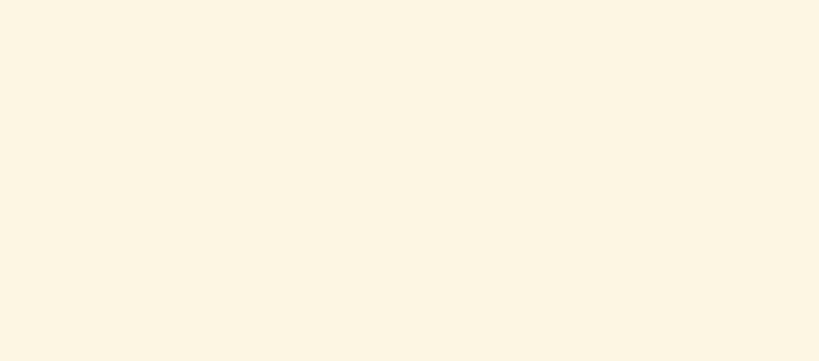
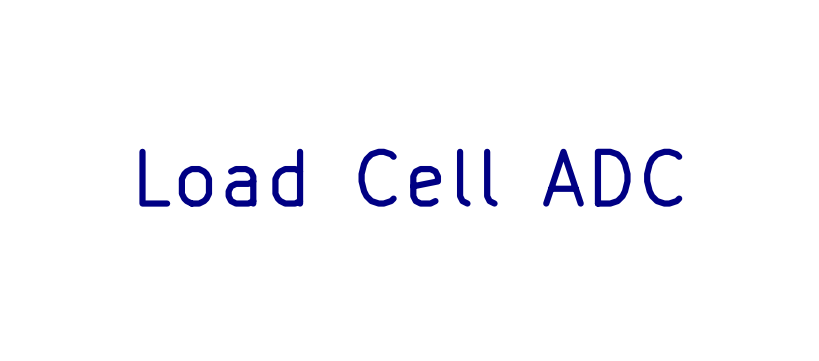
text: none -> Load Cell ADC (410, 177)

